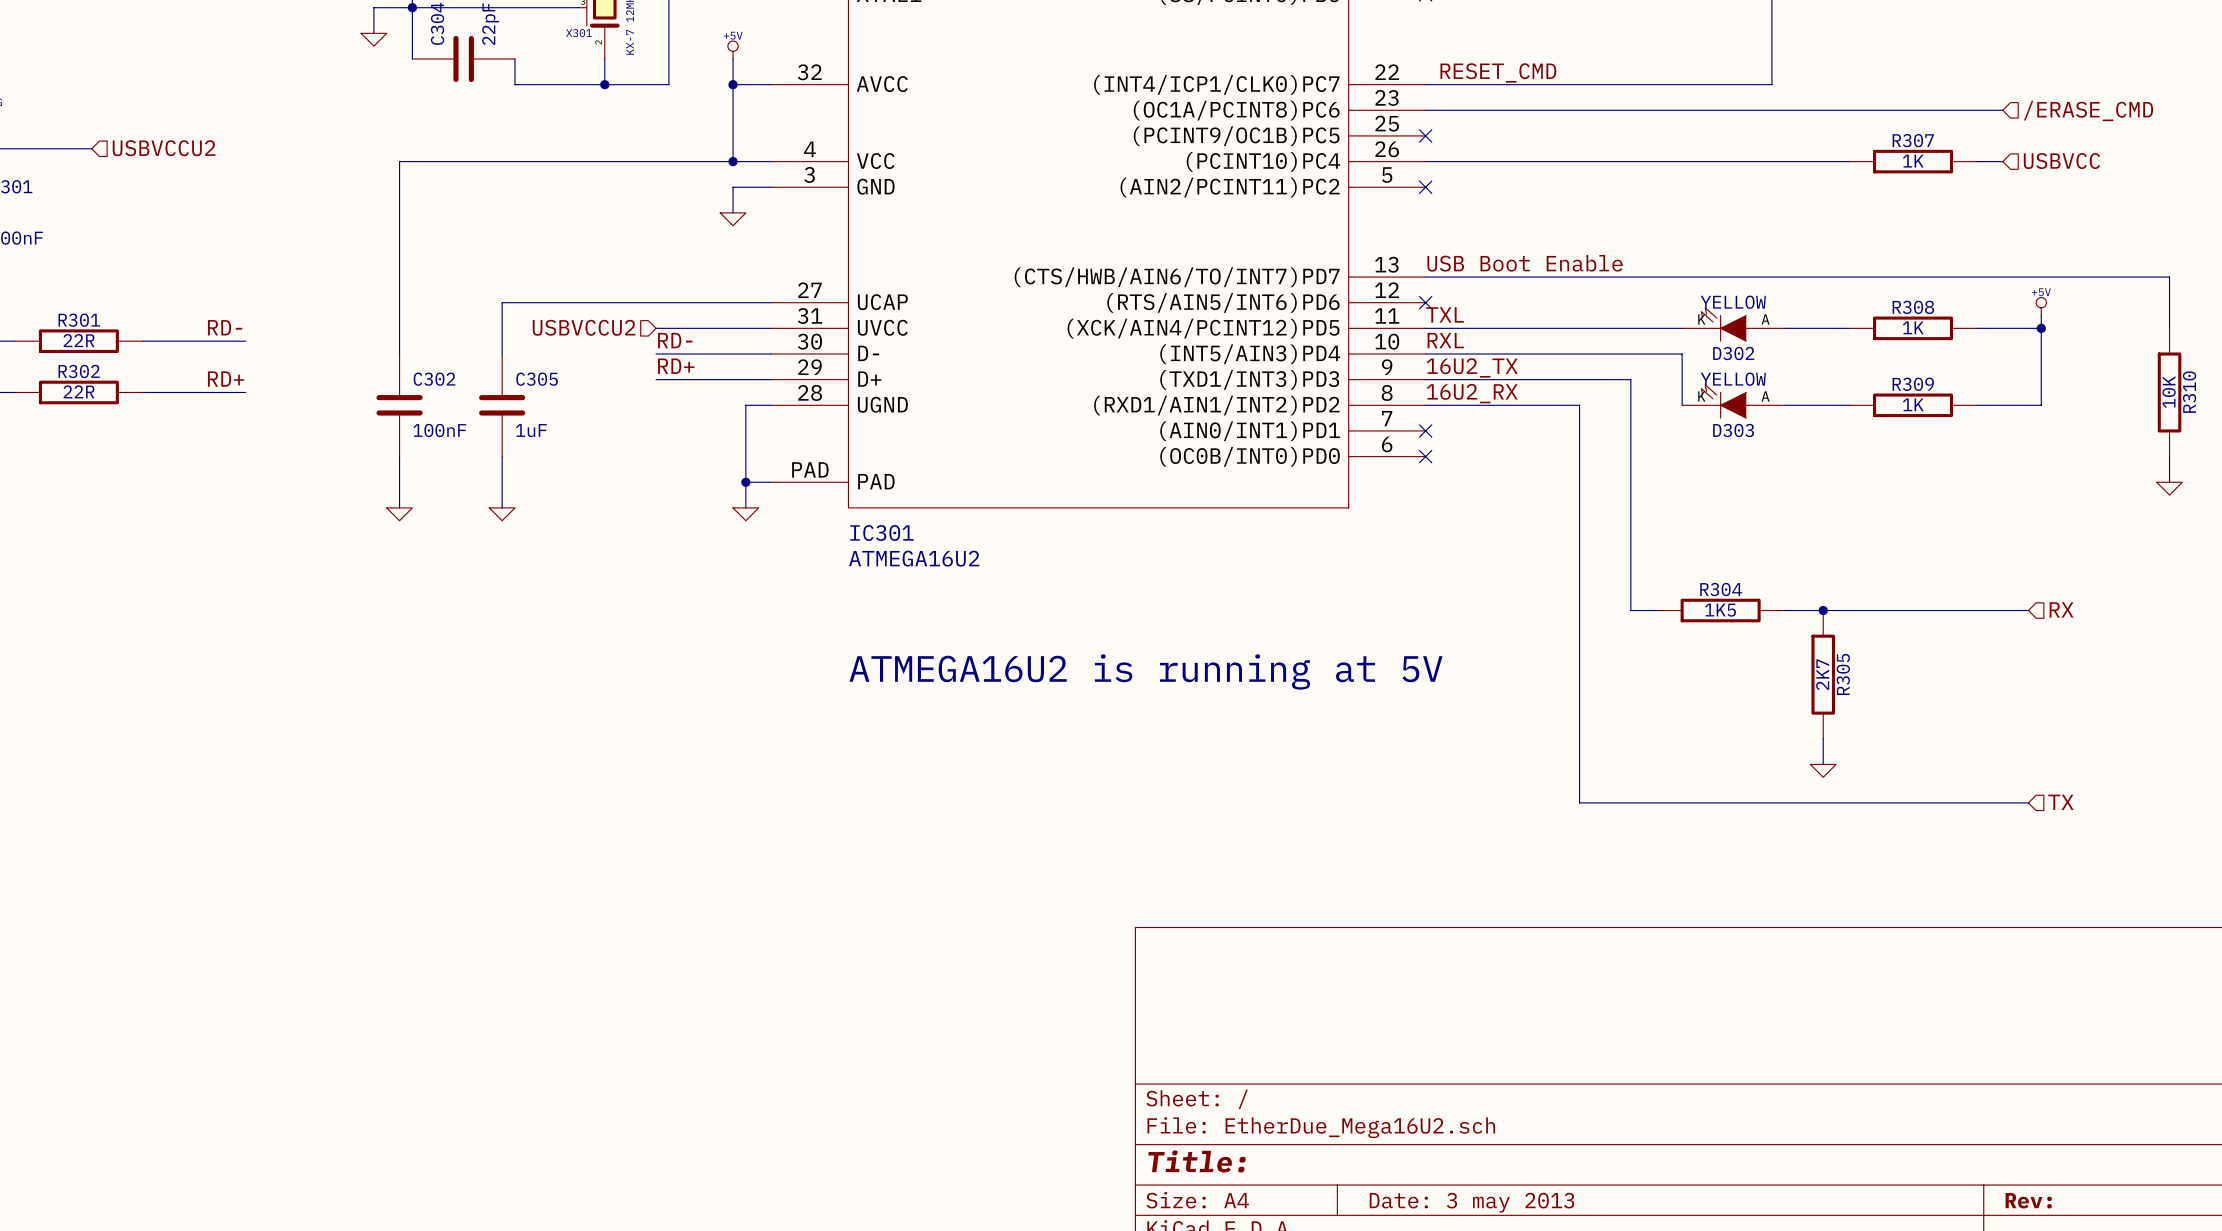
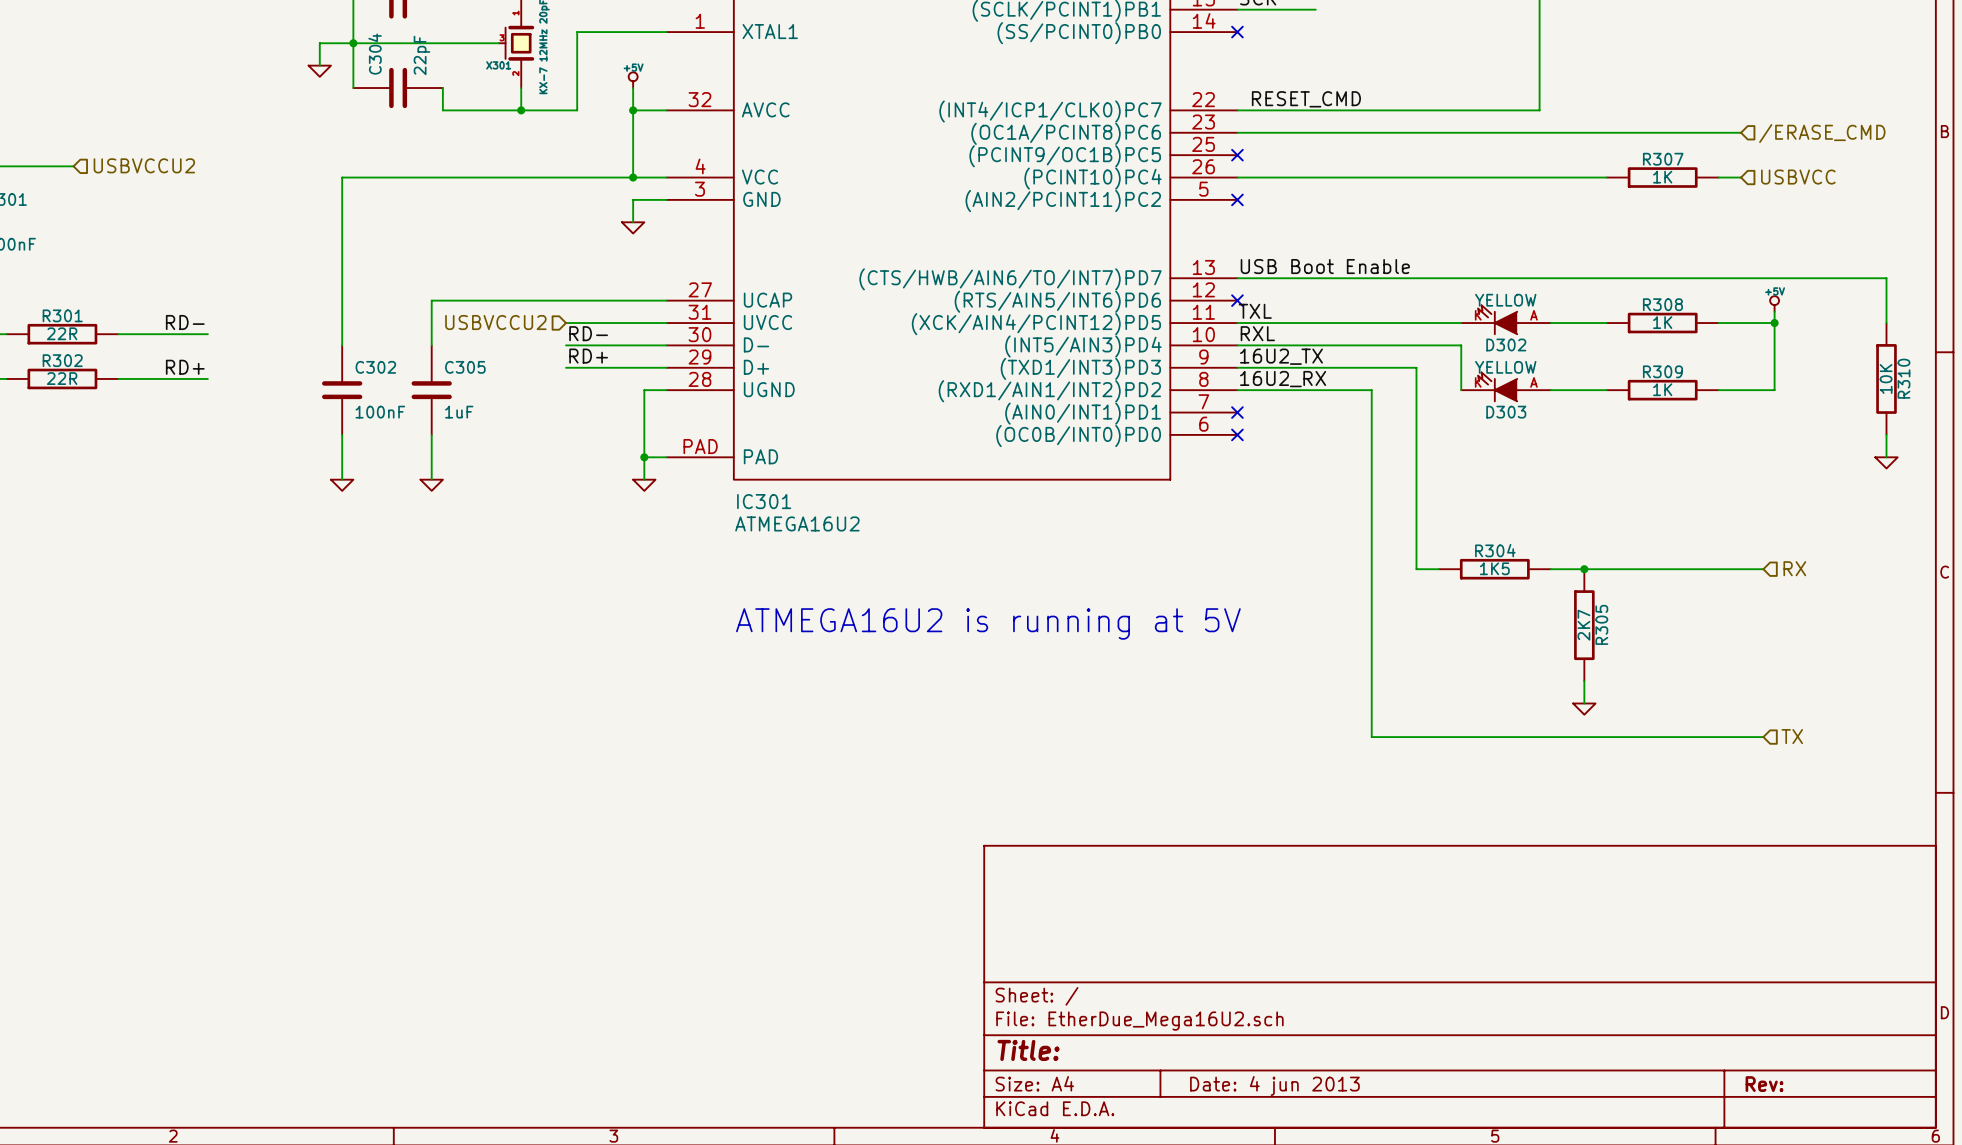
title block: Date: 3 may 2013 (1472, 1202) -> Date: 4 jun 2013 (1274, 1085)

